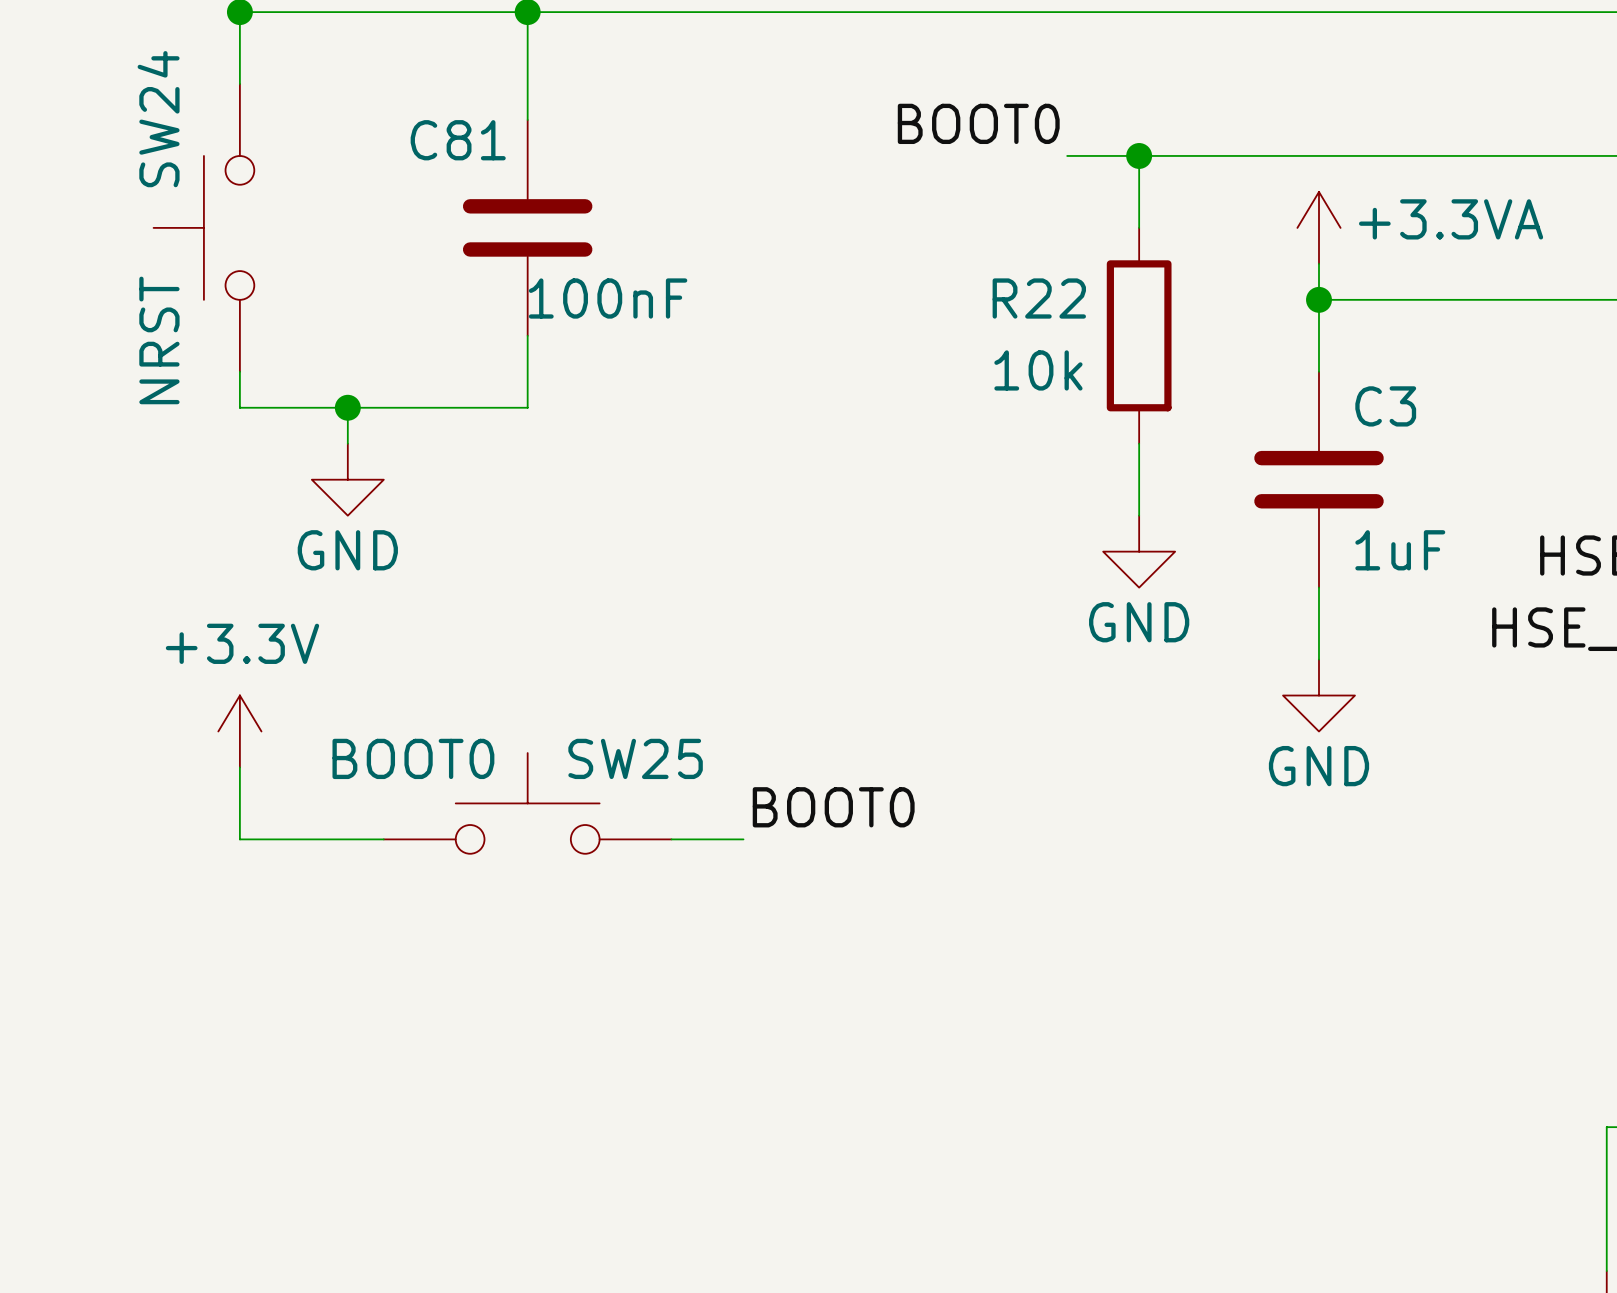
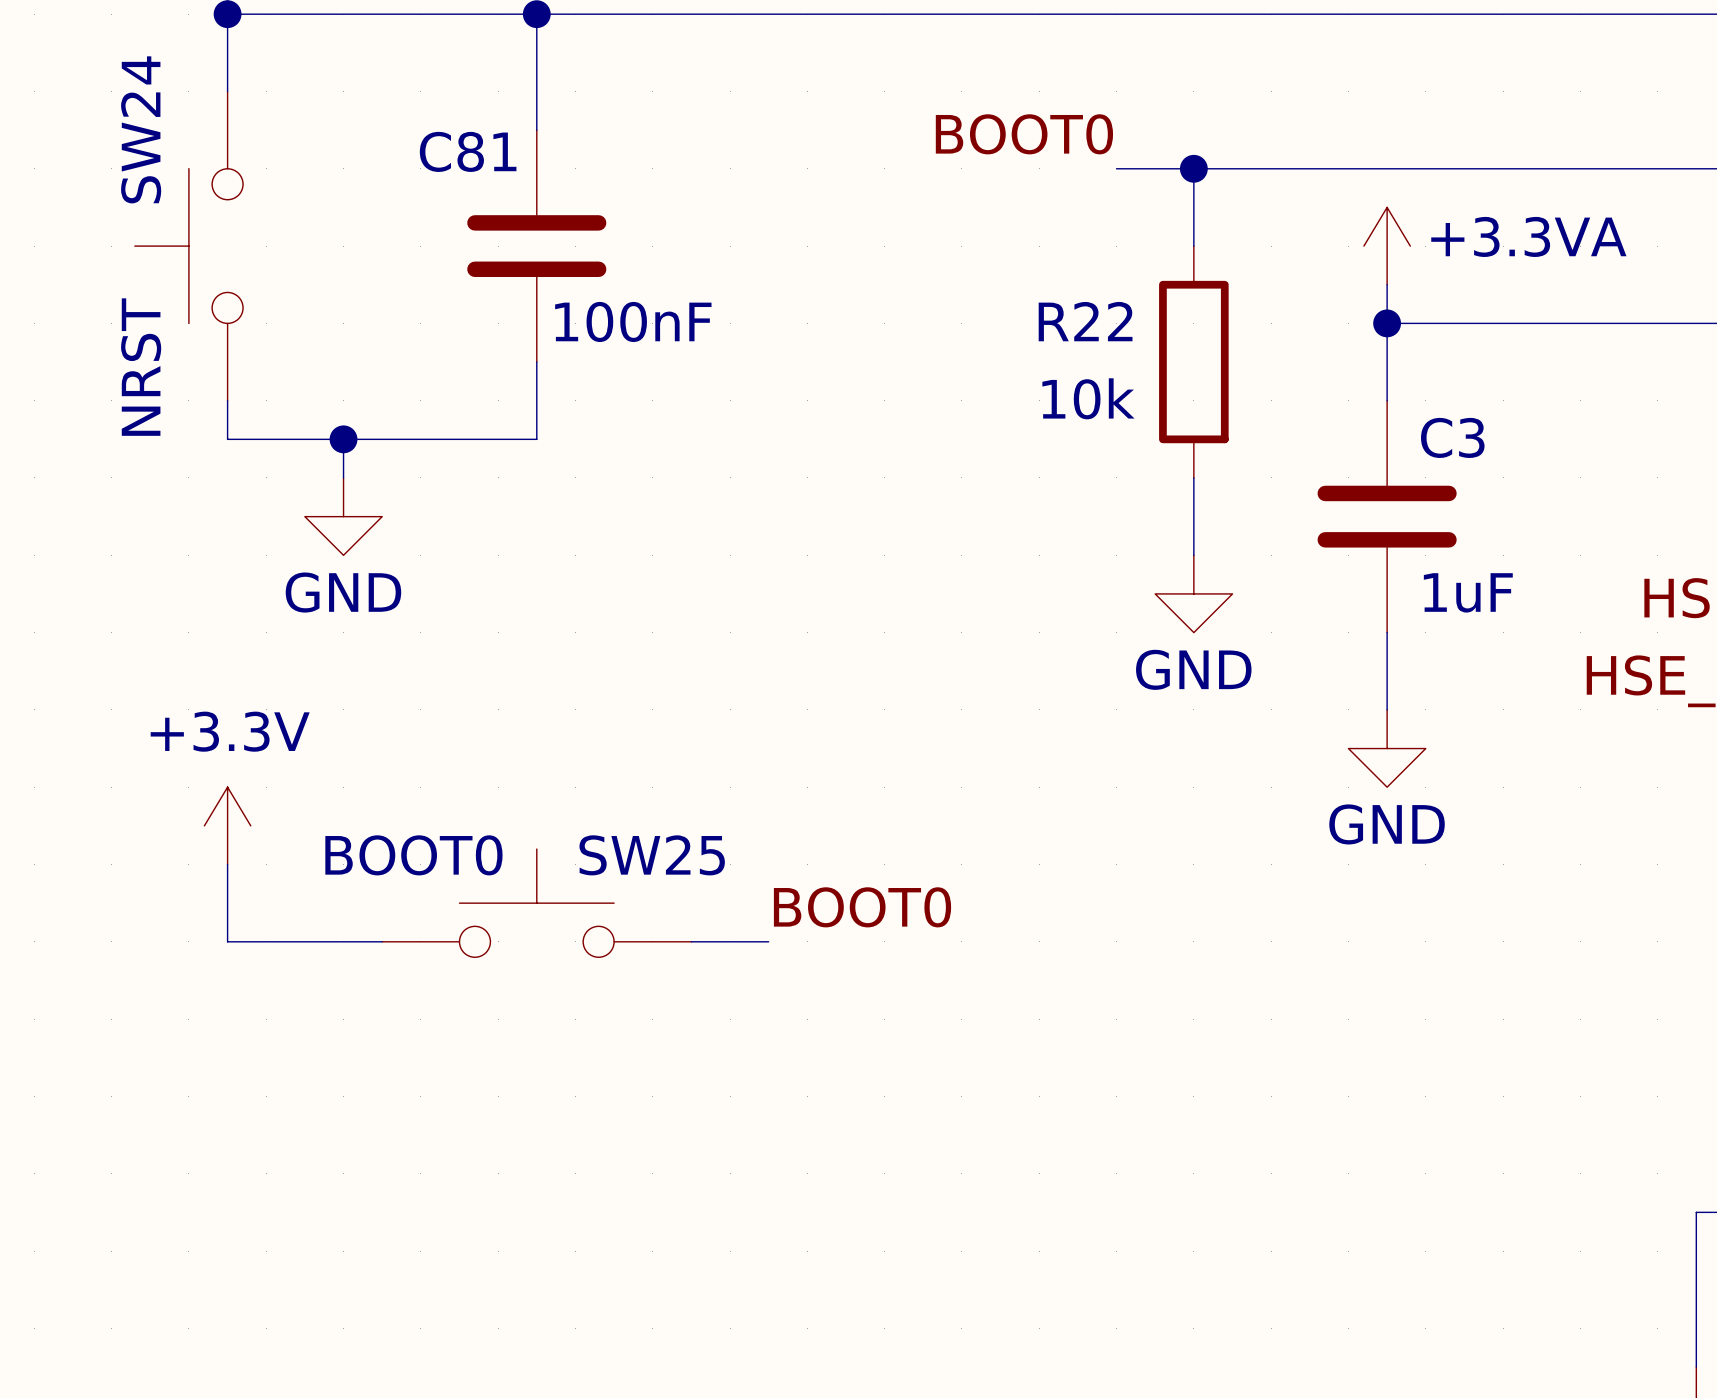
power symbol position: +3.3V (239, 731) -> +3.3V (227, 825)
SW25 position: (527, 803) -> (536, 903)
label position: BOOT0 (833, 807) -> BOOT0 (862, 907)
wire: (239, 839) (383, 839) -> (227, 903) (227, 941) (382, 941)
wire: (671, 839) (743, 839) -> (691, 941) (768, 941)

